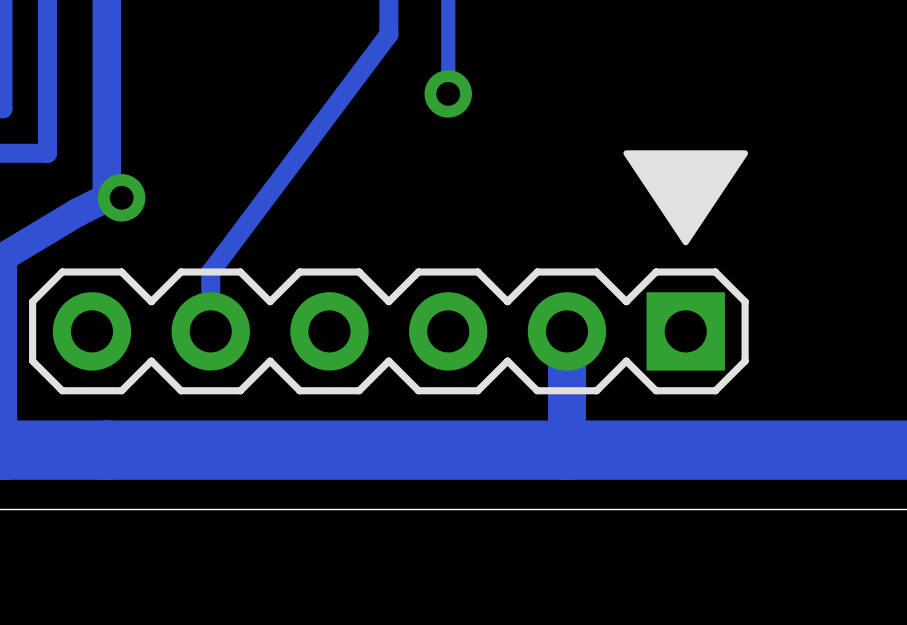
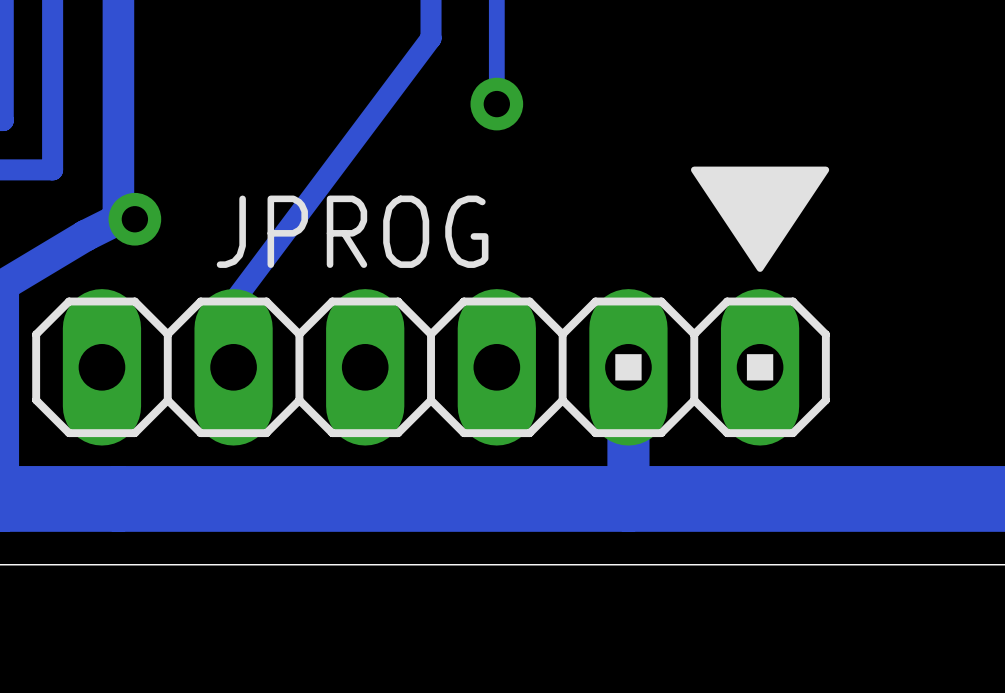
part: (388, 272) -> none
JPROG: none -> (431, 306)

